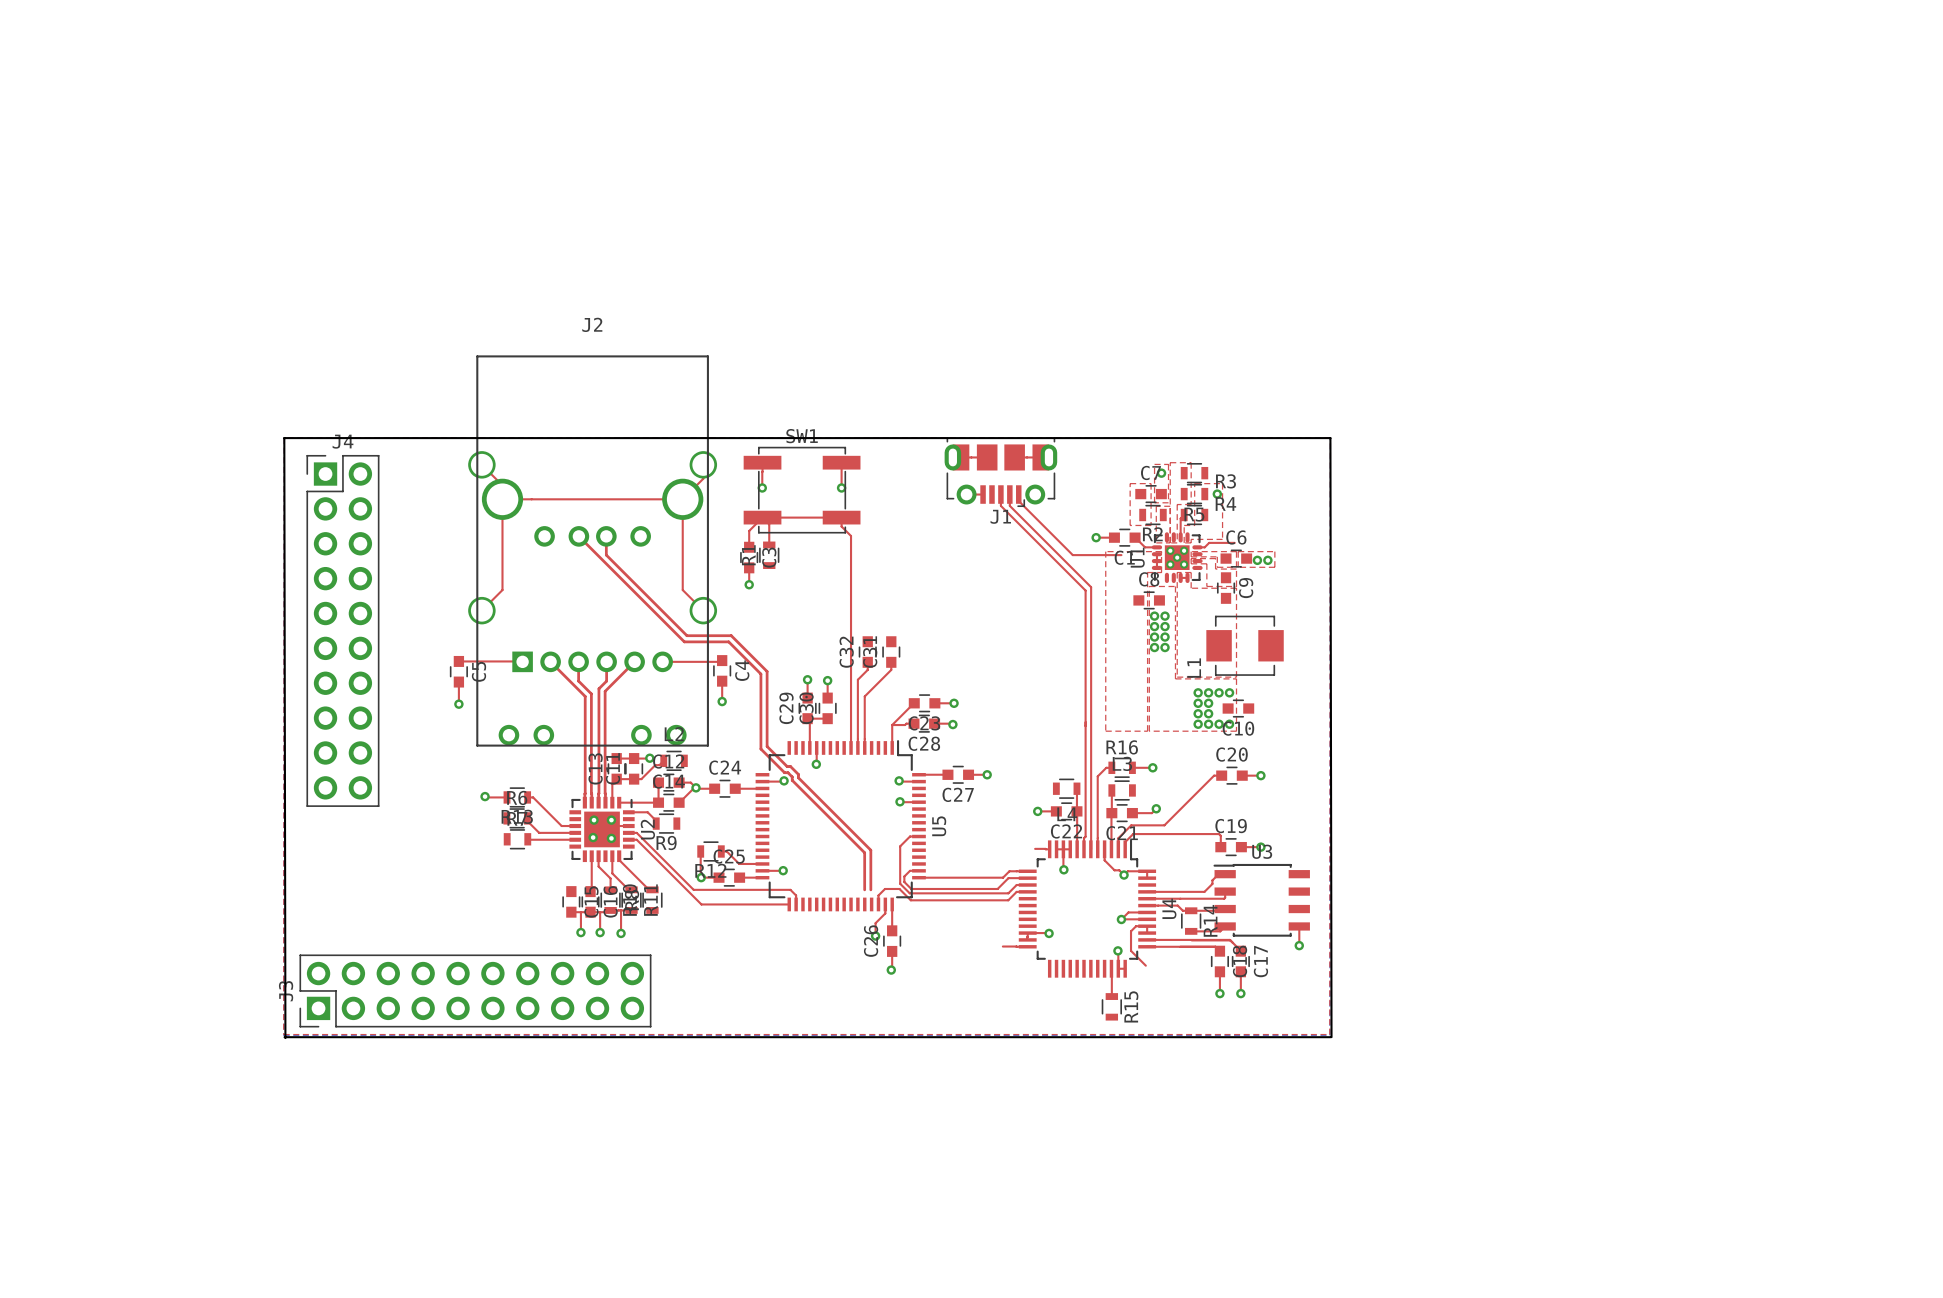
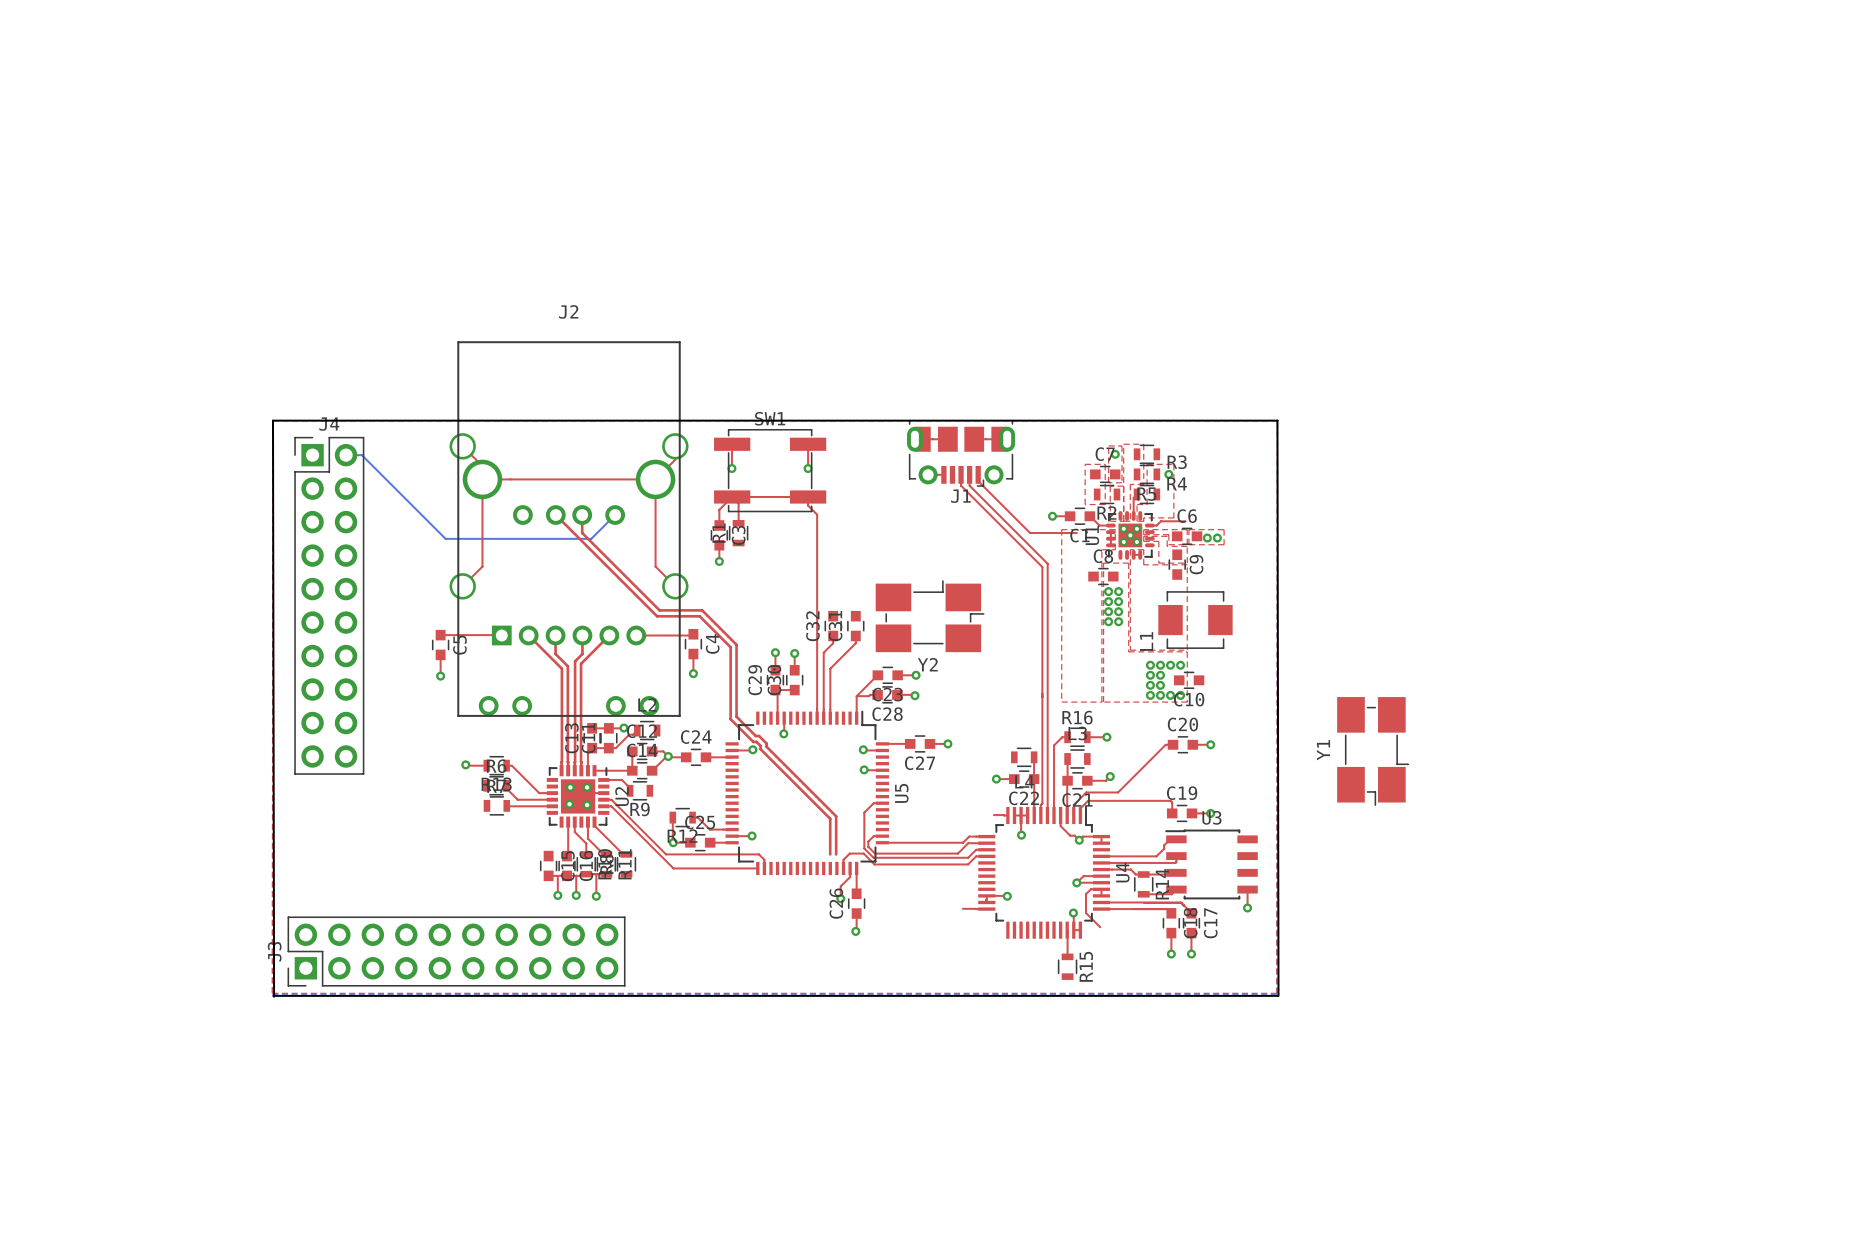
bottom track: none -> (346, 455) (361, 455) (445, 538) (591, 538) (615, 515)
Y2: none -> (930, 616)
Y1: none -> (1373, 751)

